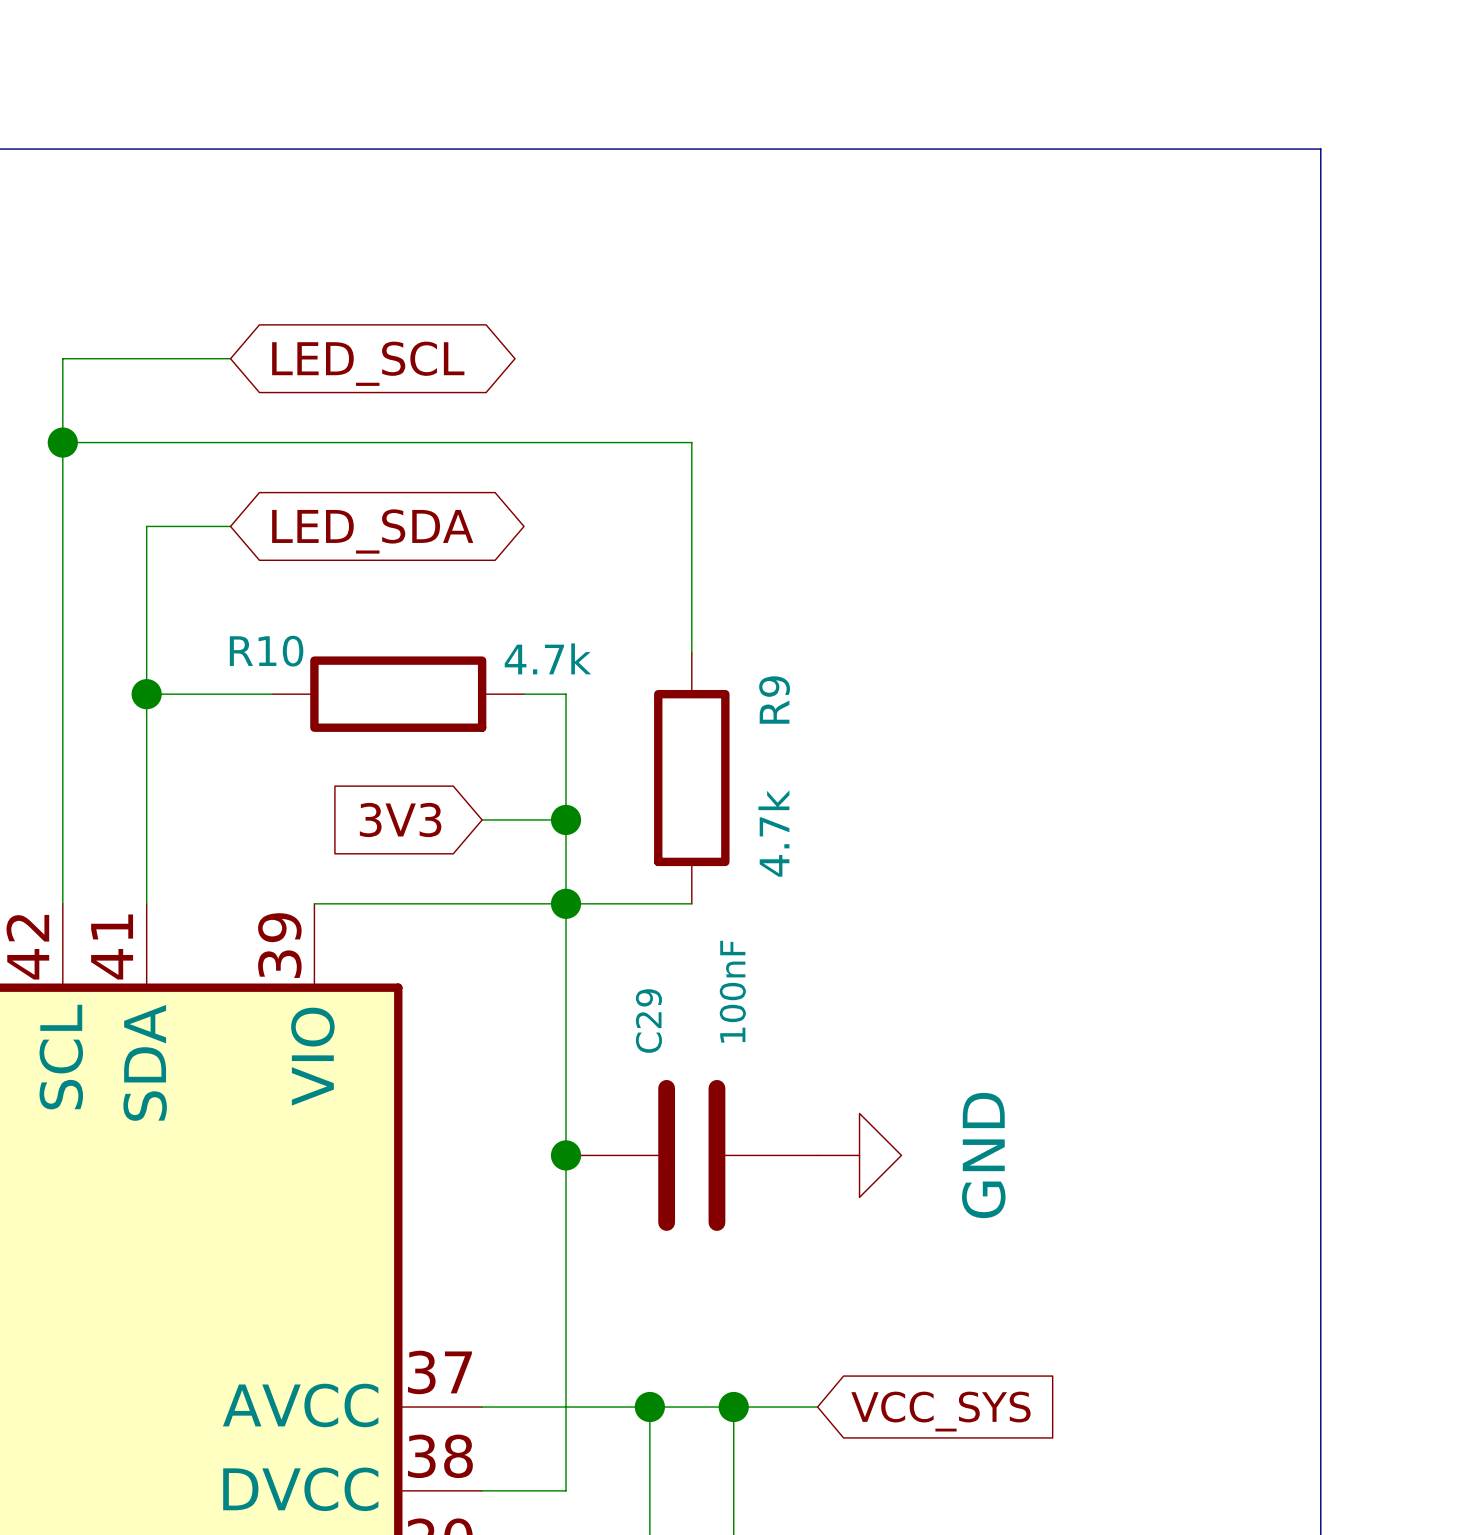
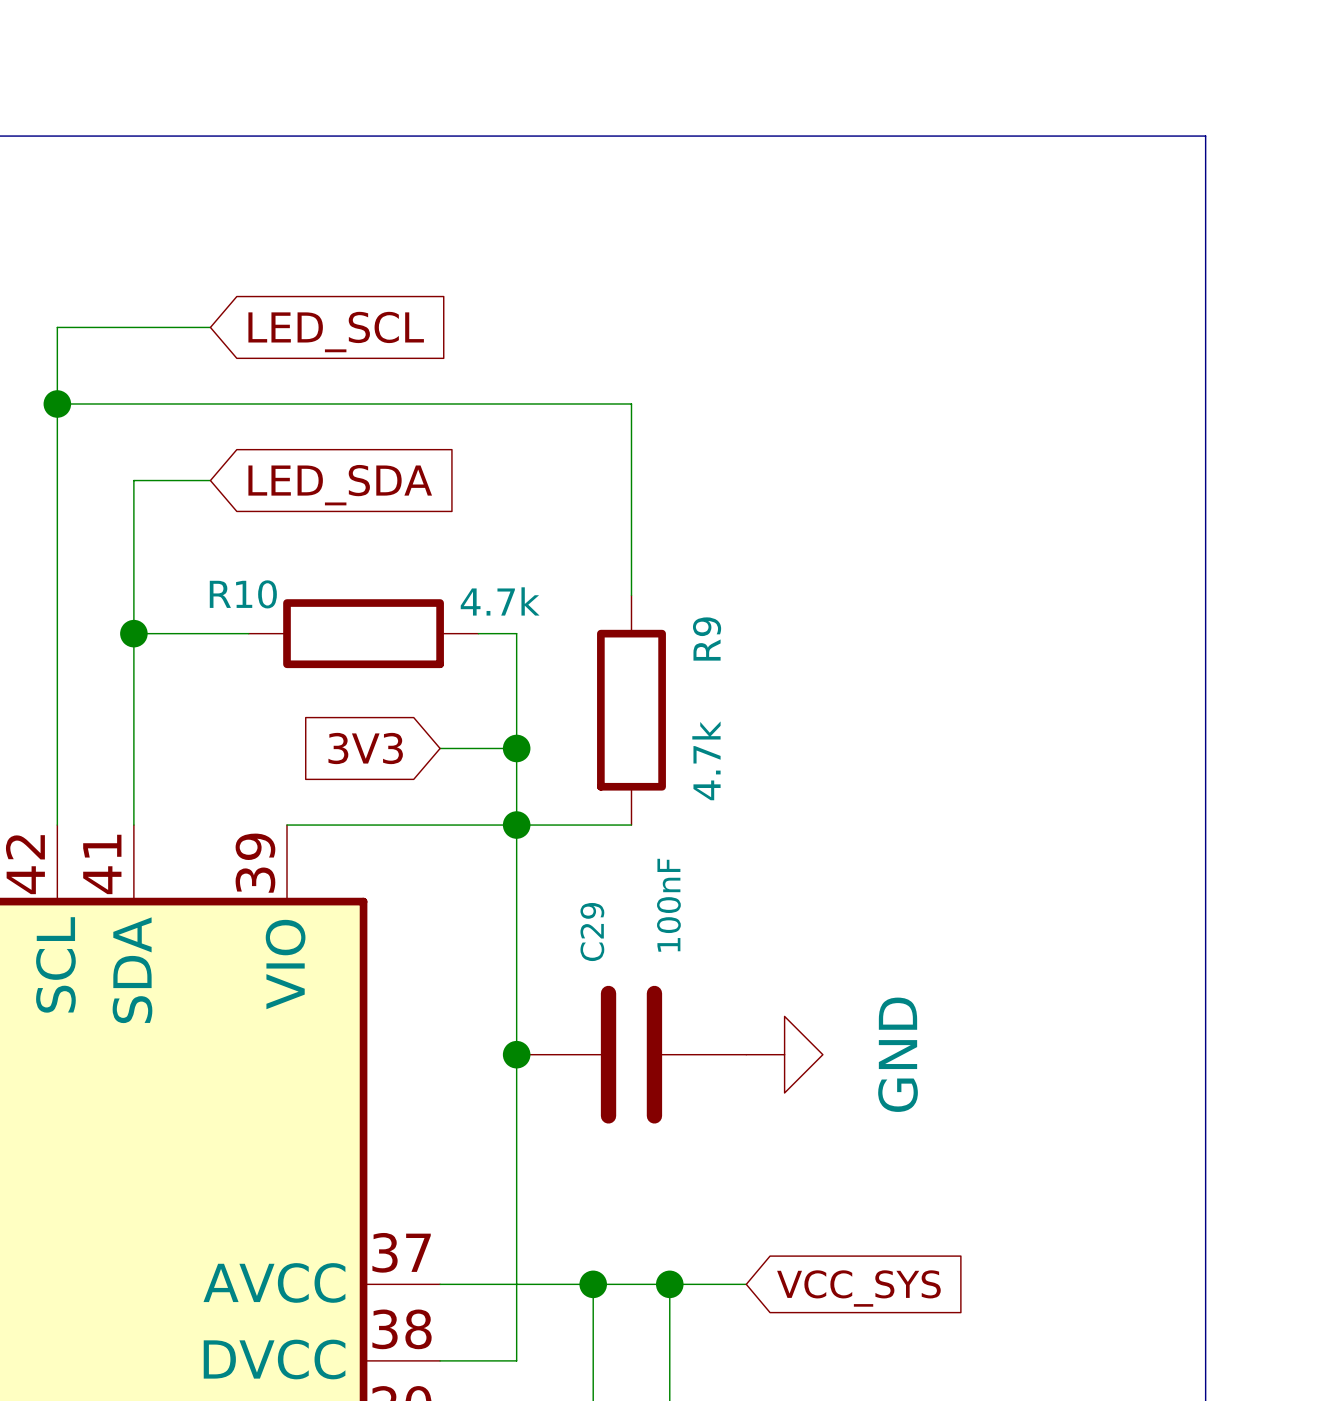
global label shape: bidirectional (368, 363) -> input (336, 332)
global label shape: bidirectional (372, 531) -> input (340, 485)

